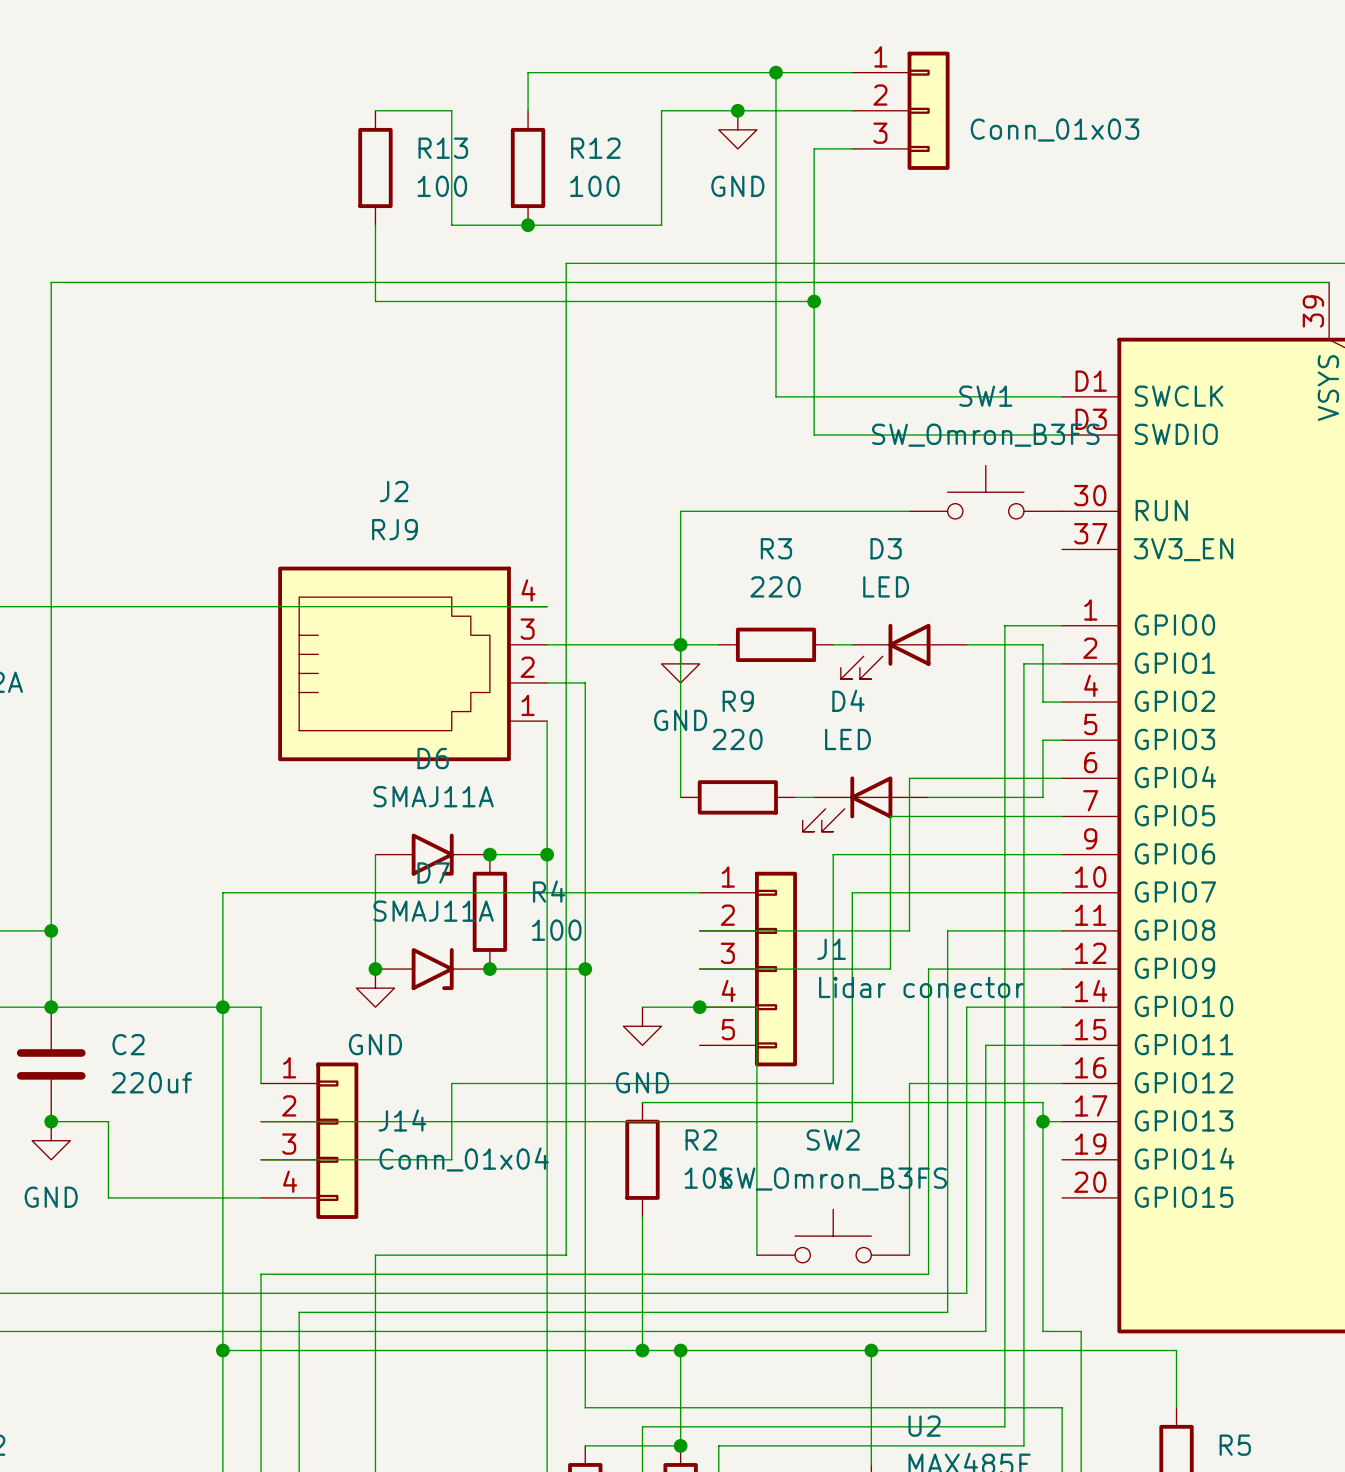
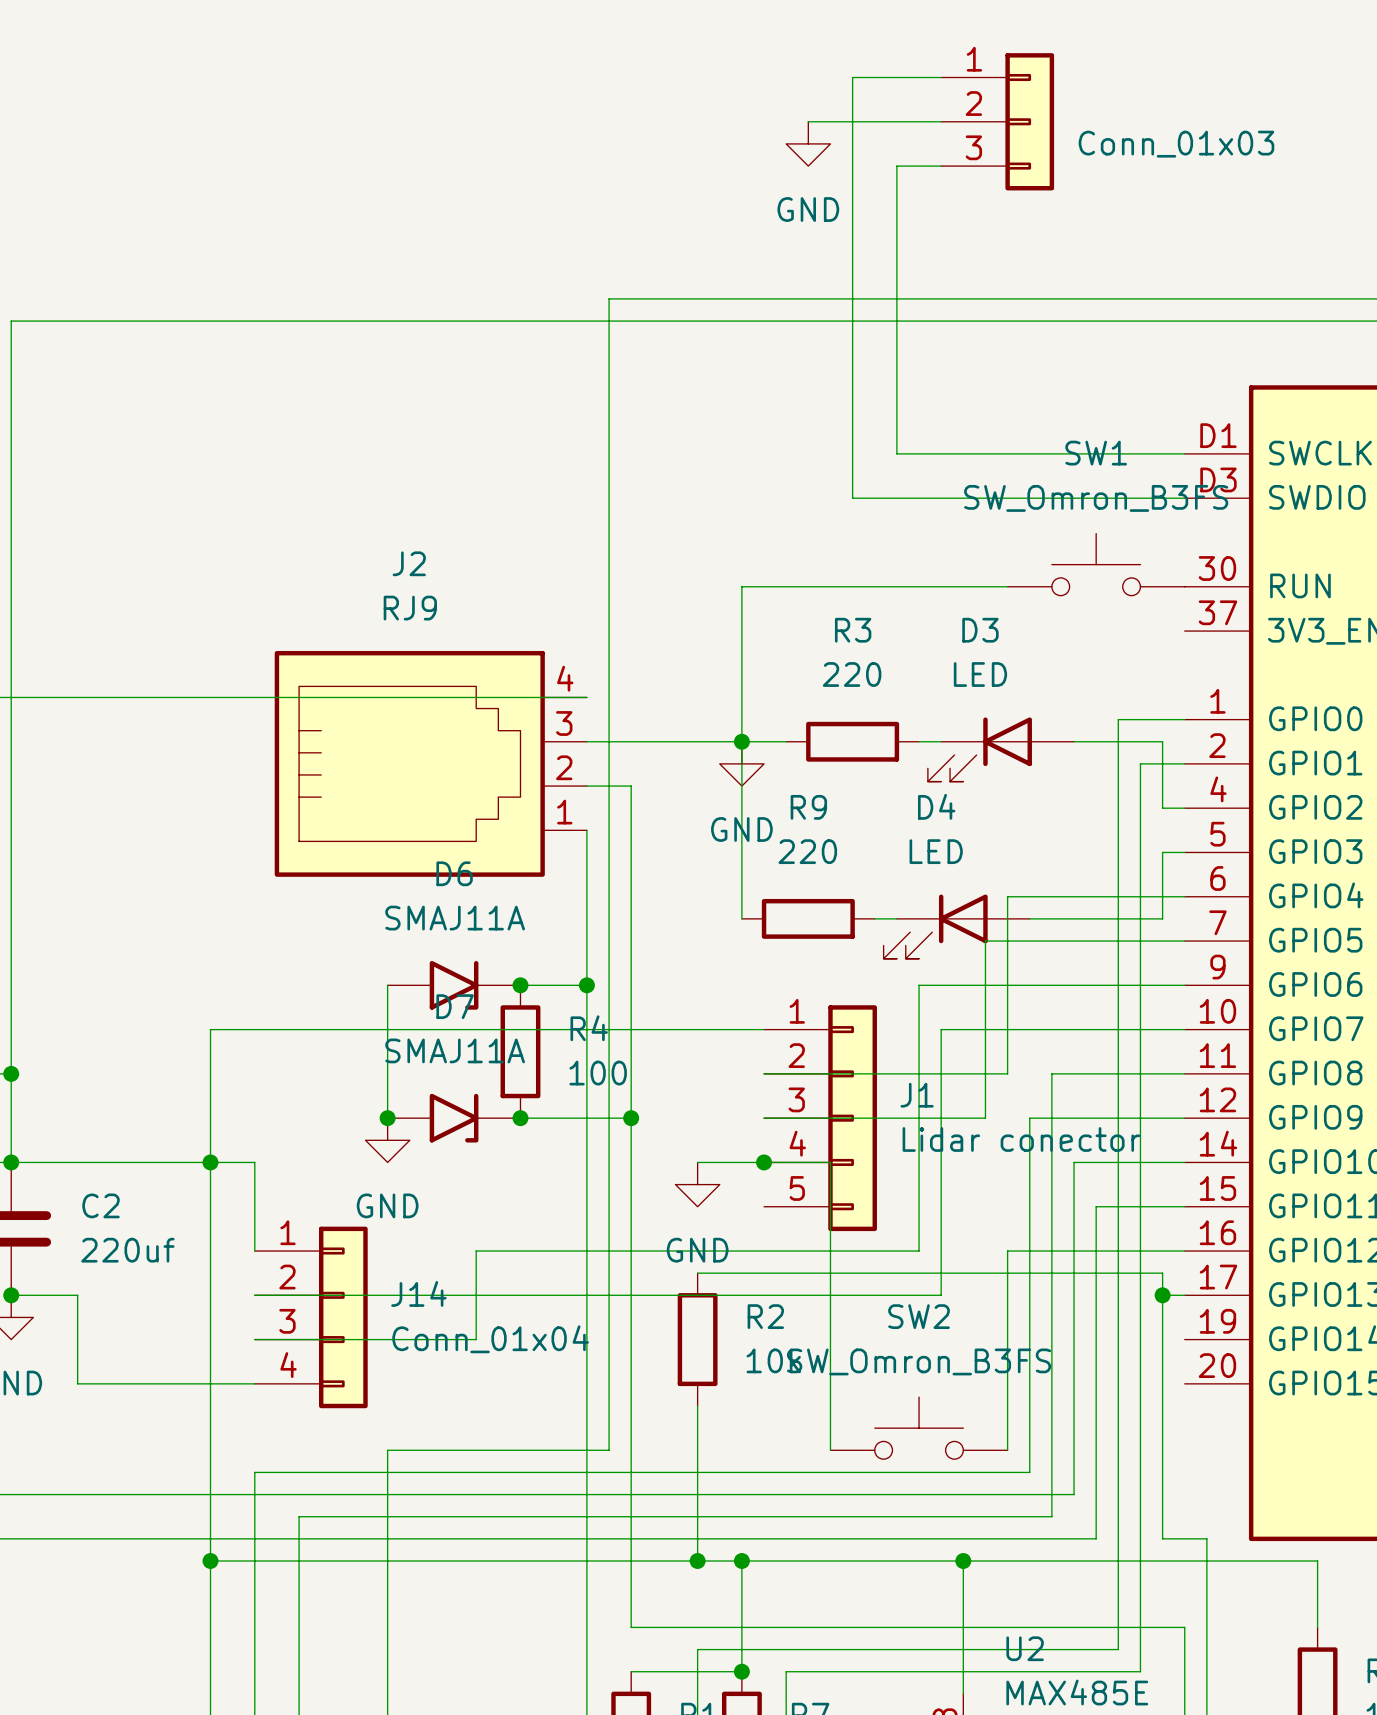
wire: (775, 72) (528, 72) (528, 110) -> none
junction: (775, 72) -> none
wire: (375, 110) (451, 110) (451, 225) (661, 225) (661, 110) (737, 110) -> none
junction: (737, 110) -> none
R13: 100 (375, 167) -> none
R12: 100 (528, 167) -> none
wire: (375, 225) (375, 301) (814, 301) -> none
junction: (528, 225) -> none
junction: (814, 301) -> none
wire: (775, 396) (814, 396) (814, 435) -> (852, 453) (852, 498) (896, 498)

